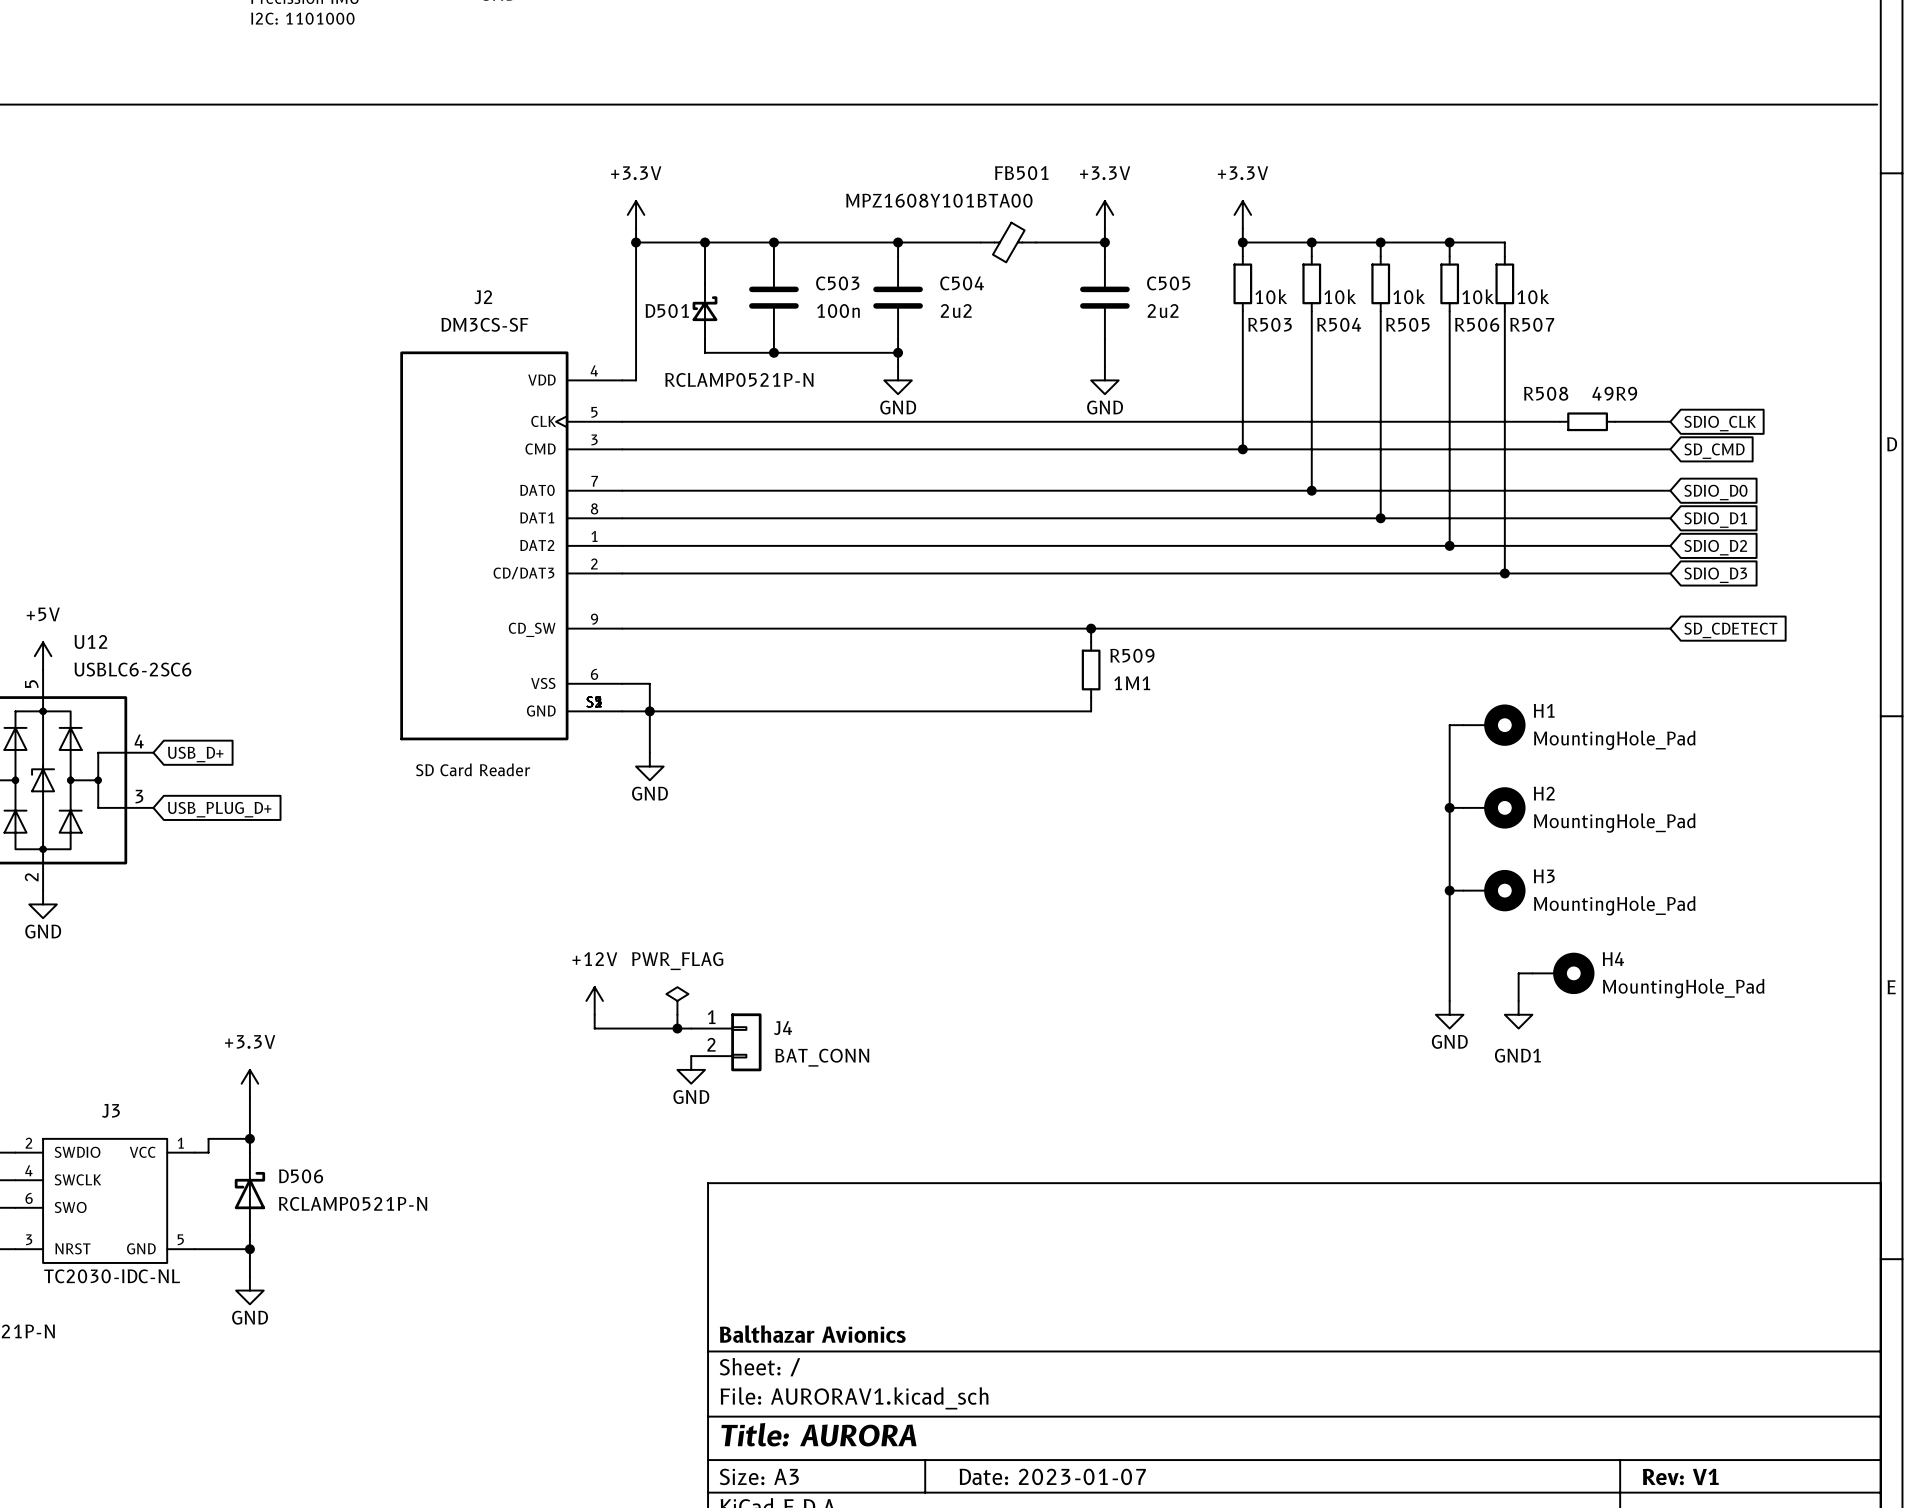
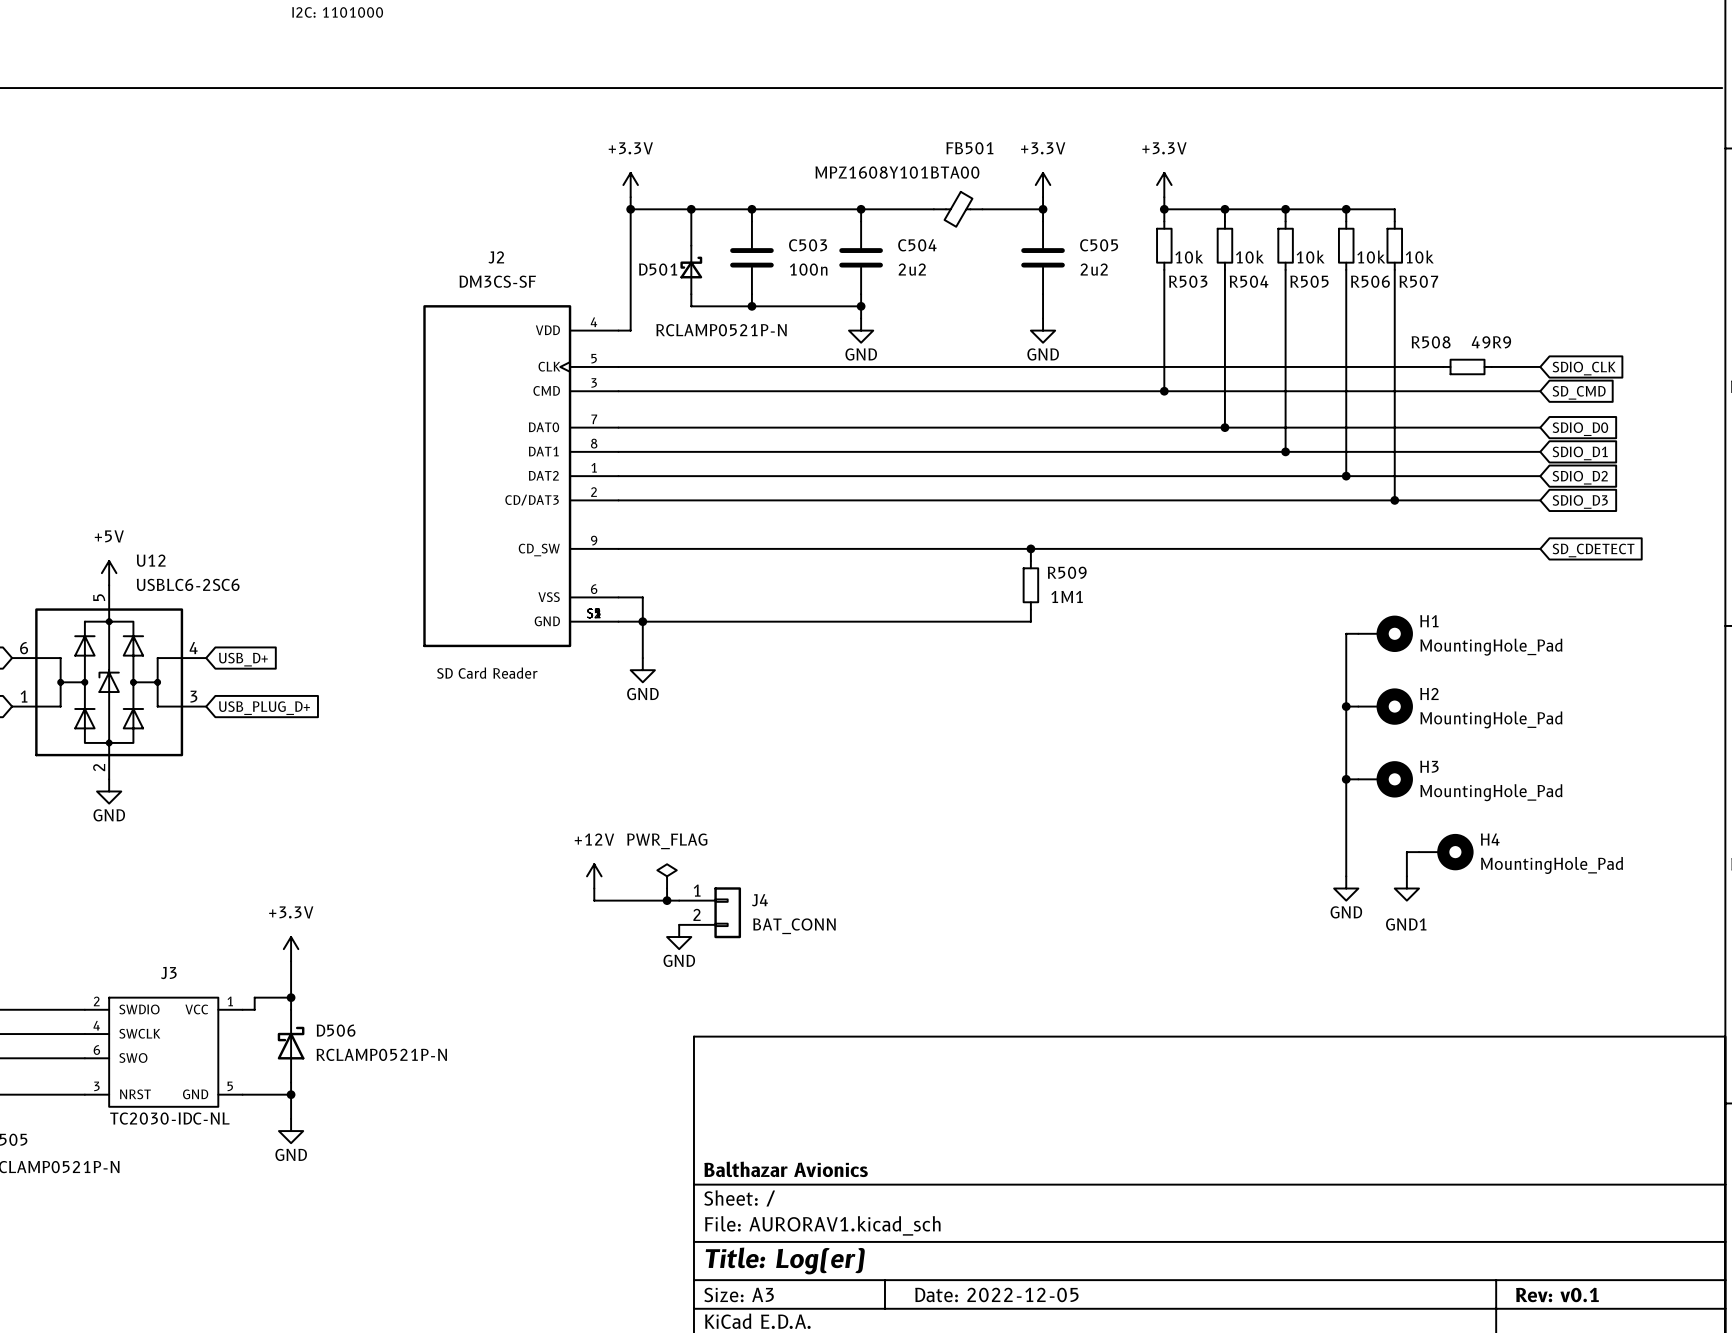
title block: Title: AURORA (818, 1434) -> Title: Log(er) (785, 1260)
title block: Date: 2023-01-07 (1052, 1476) -> Date: 2022-12-05 (996, 1294)
title block: Rev: V1 (1680, 1476) -> Rev: v0.1 (1557, 1295)

